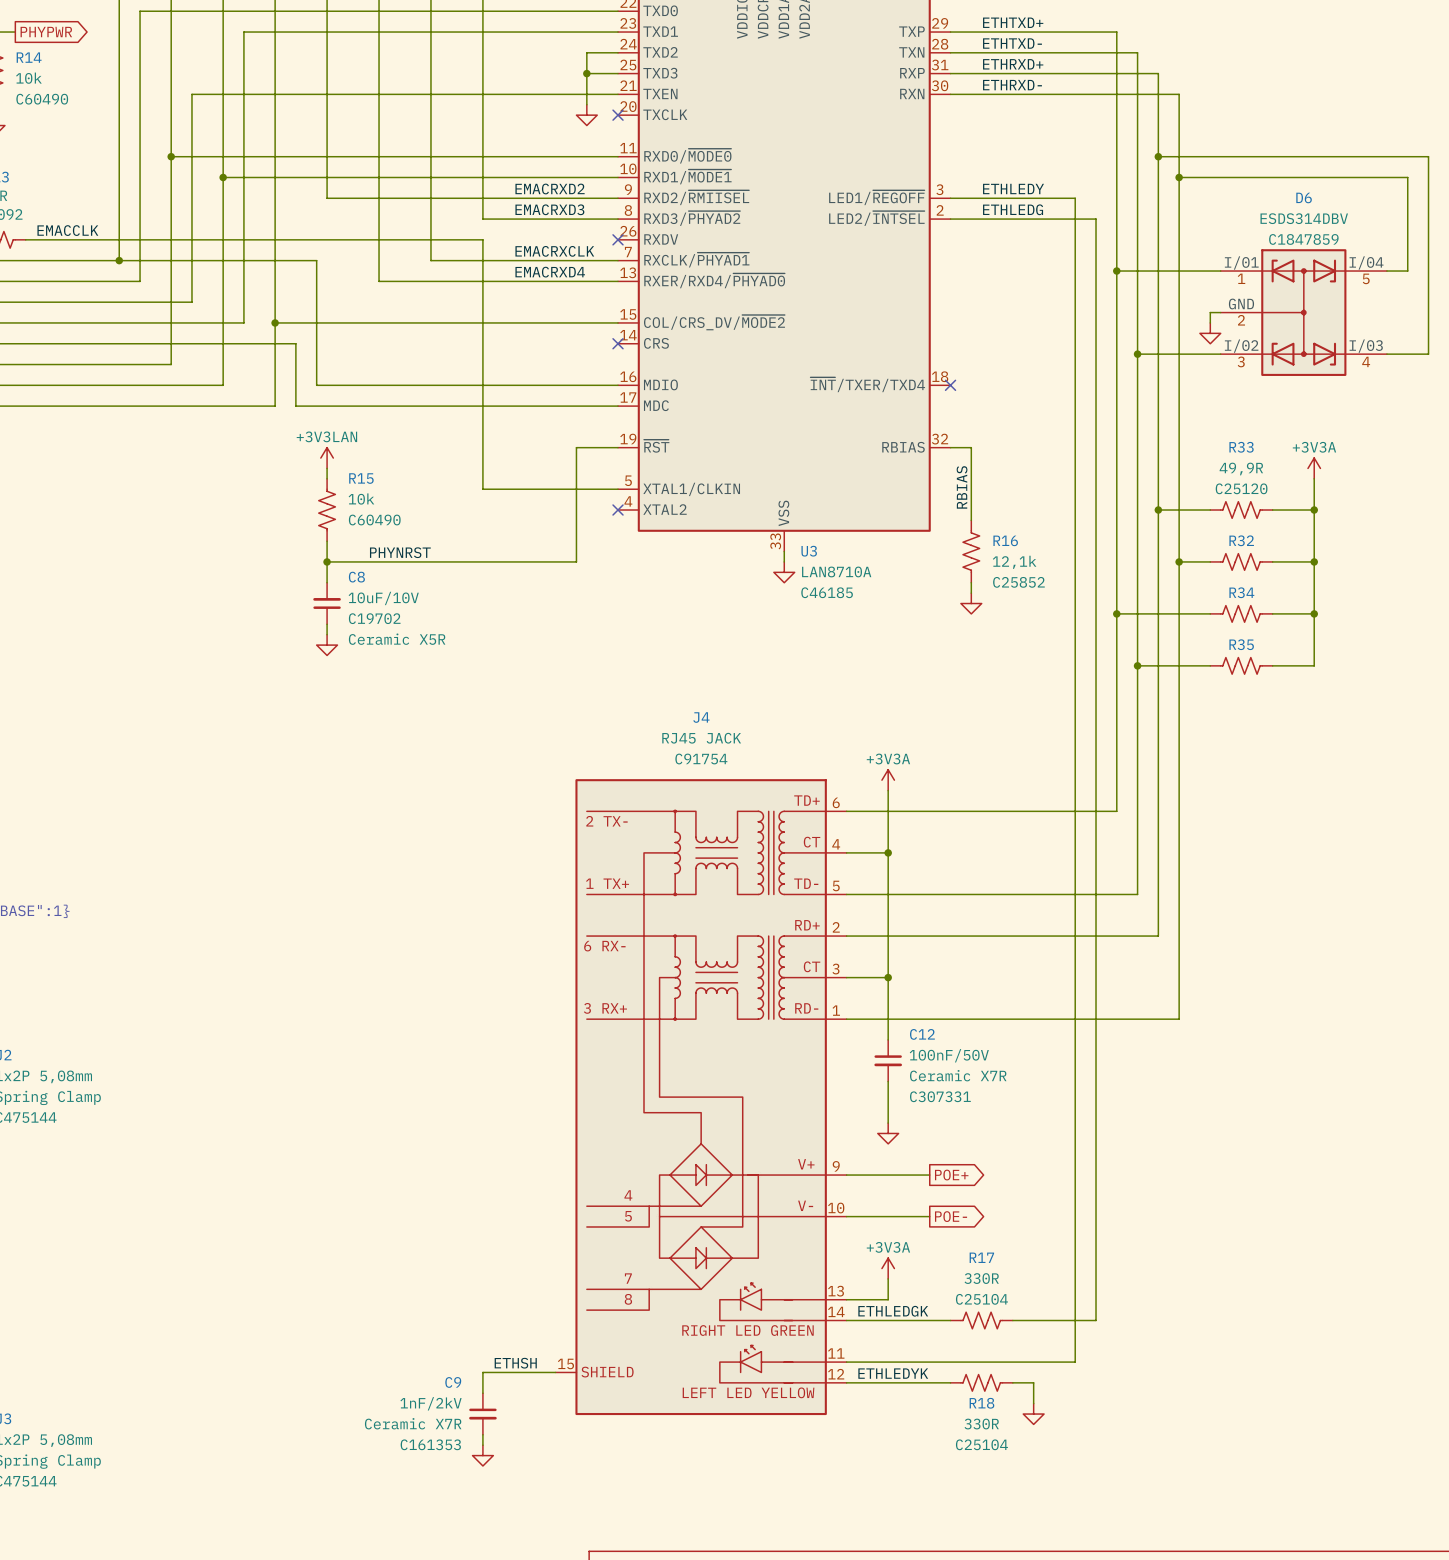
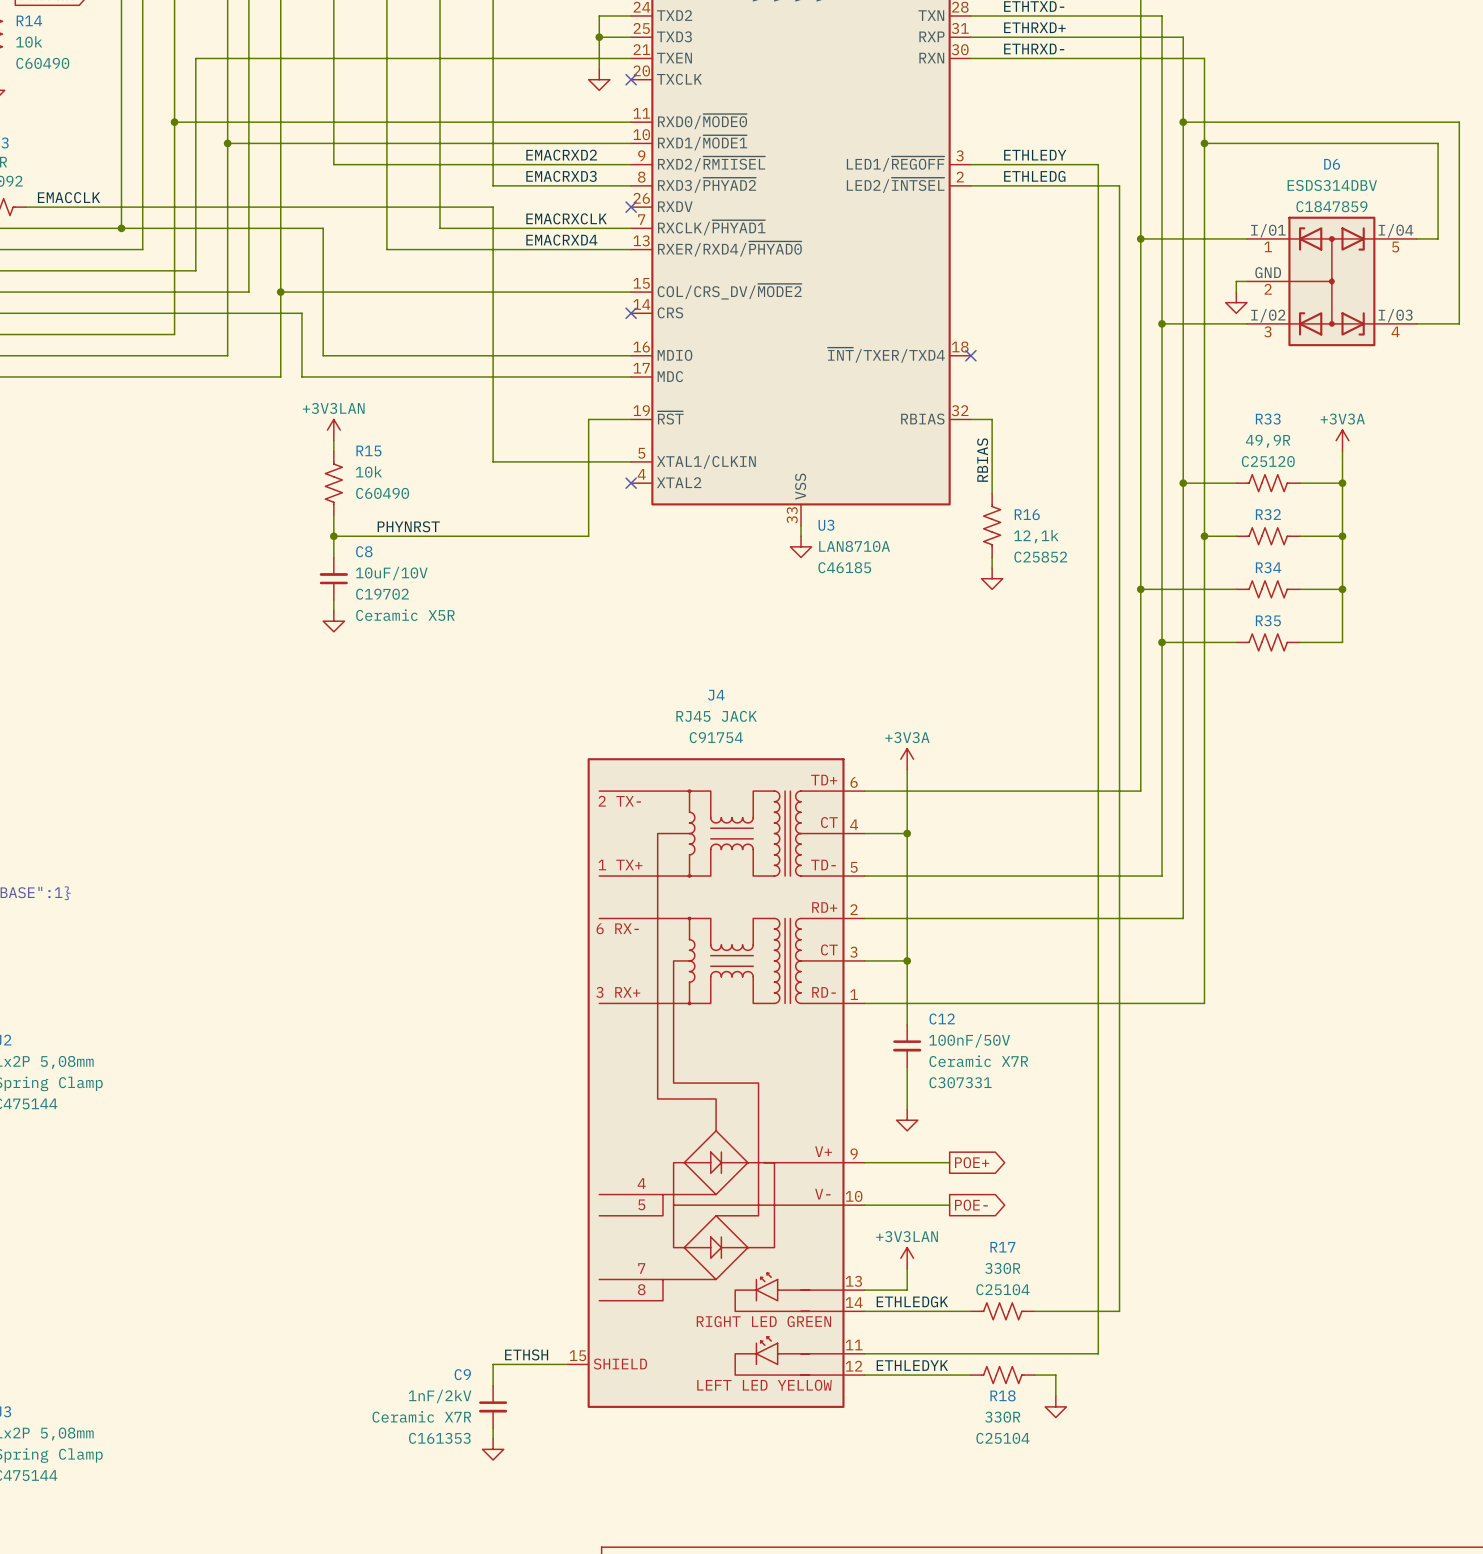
power symbol: +3V3A (888, 1268) -> +3V3LAN (907, 1258)

